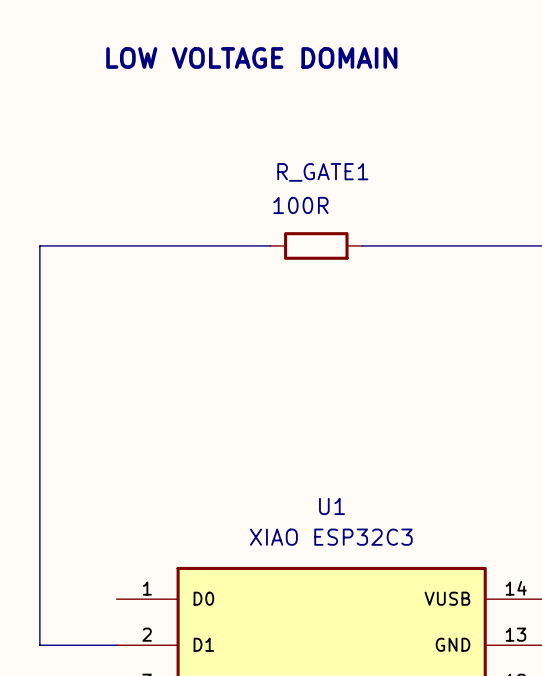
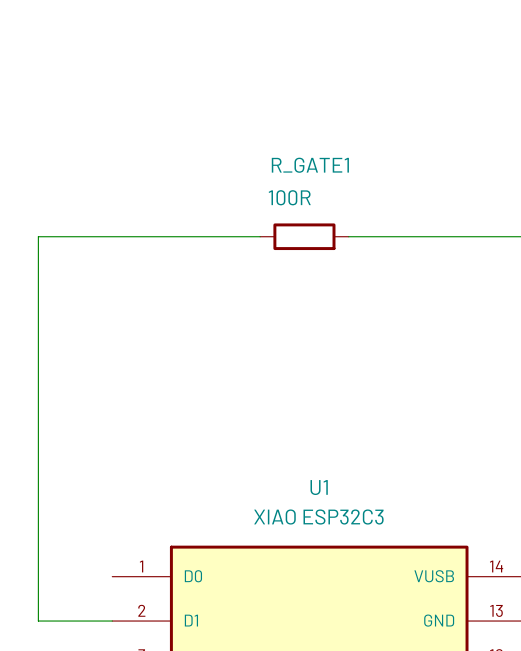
text: LOW VOLTAGE DOMAIN (251, 57) -> none

